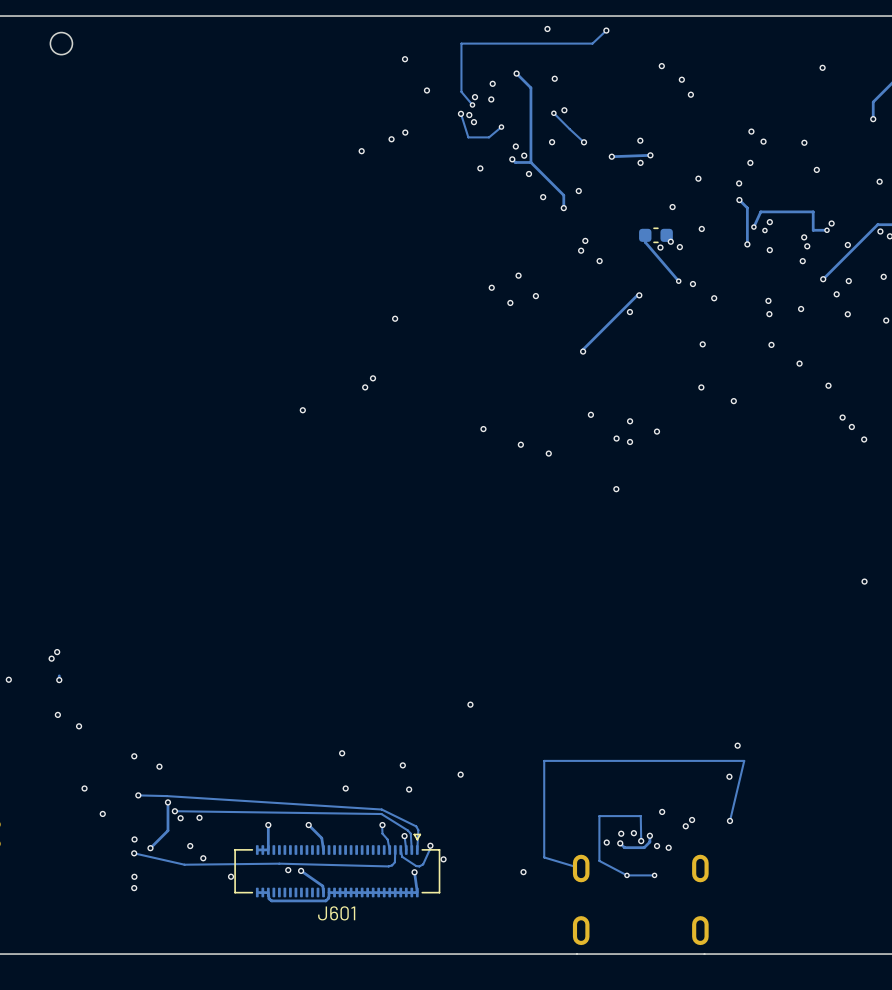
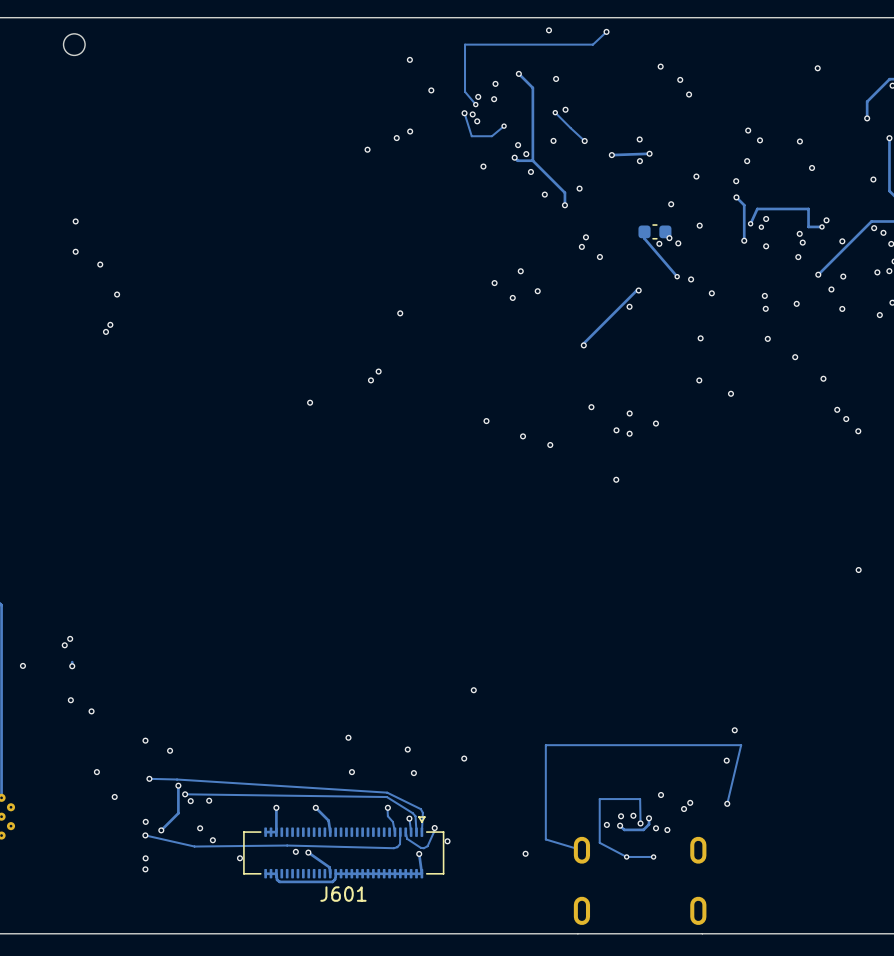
via: none -> (75, 221)
via: none -> (75, 251)
via: none -> (100, 264)
via: none -> (117, 294)
via: none -> (110, 324)
via: none -> (105, 331)

